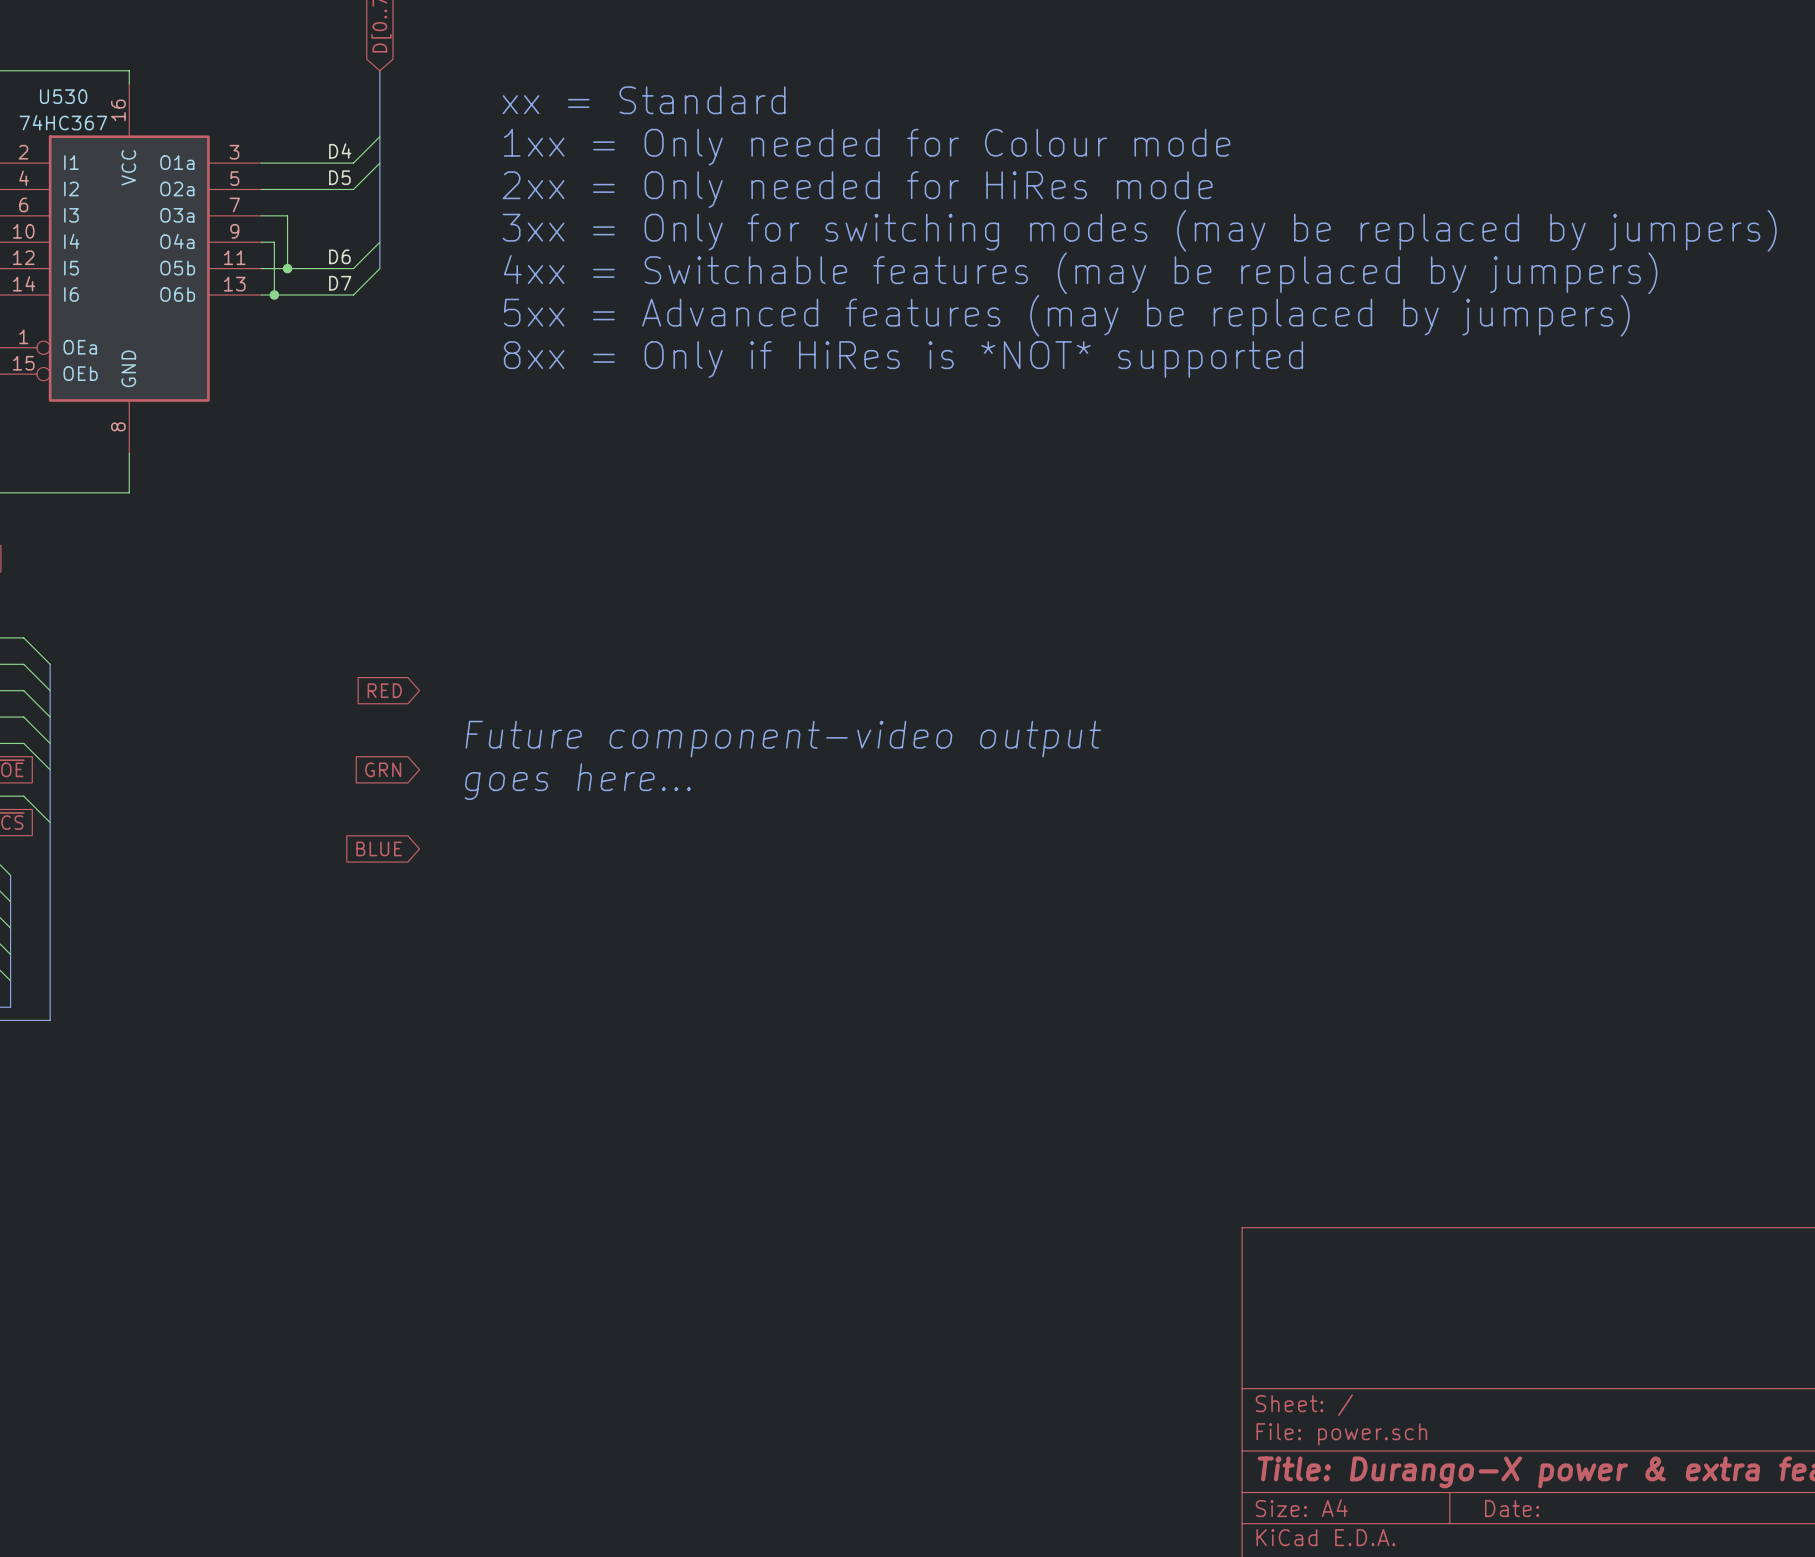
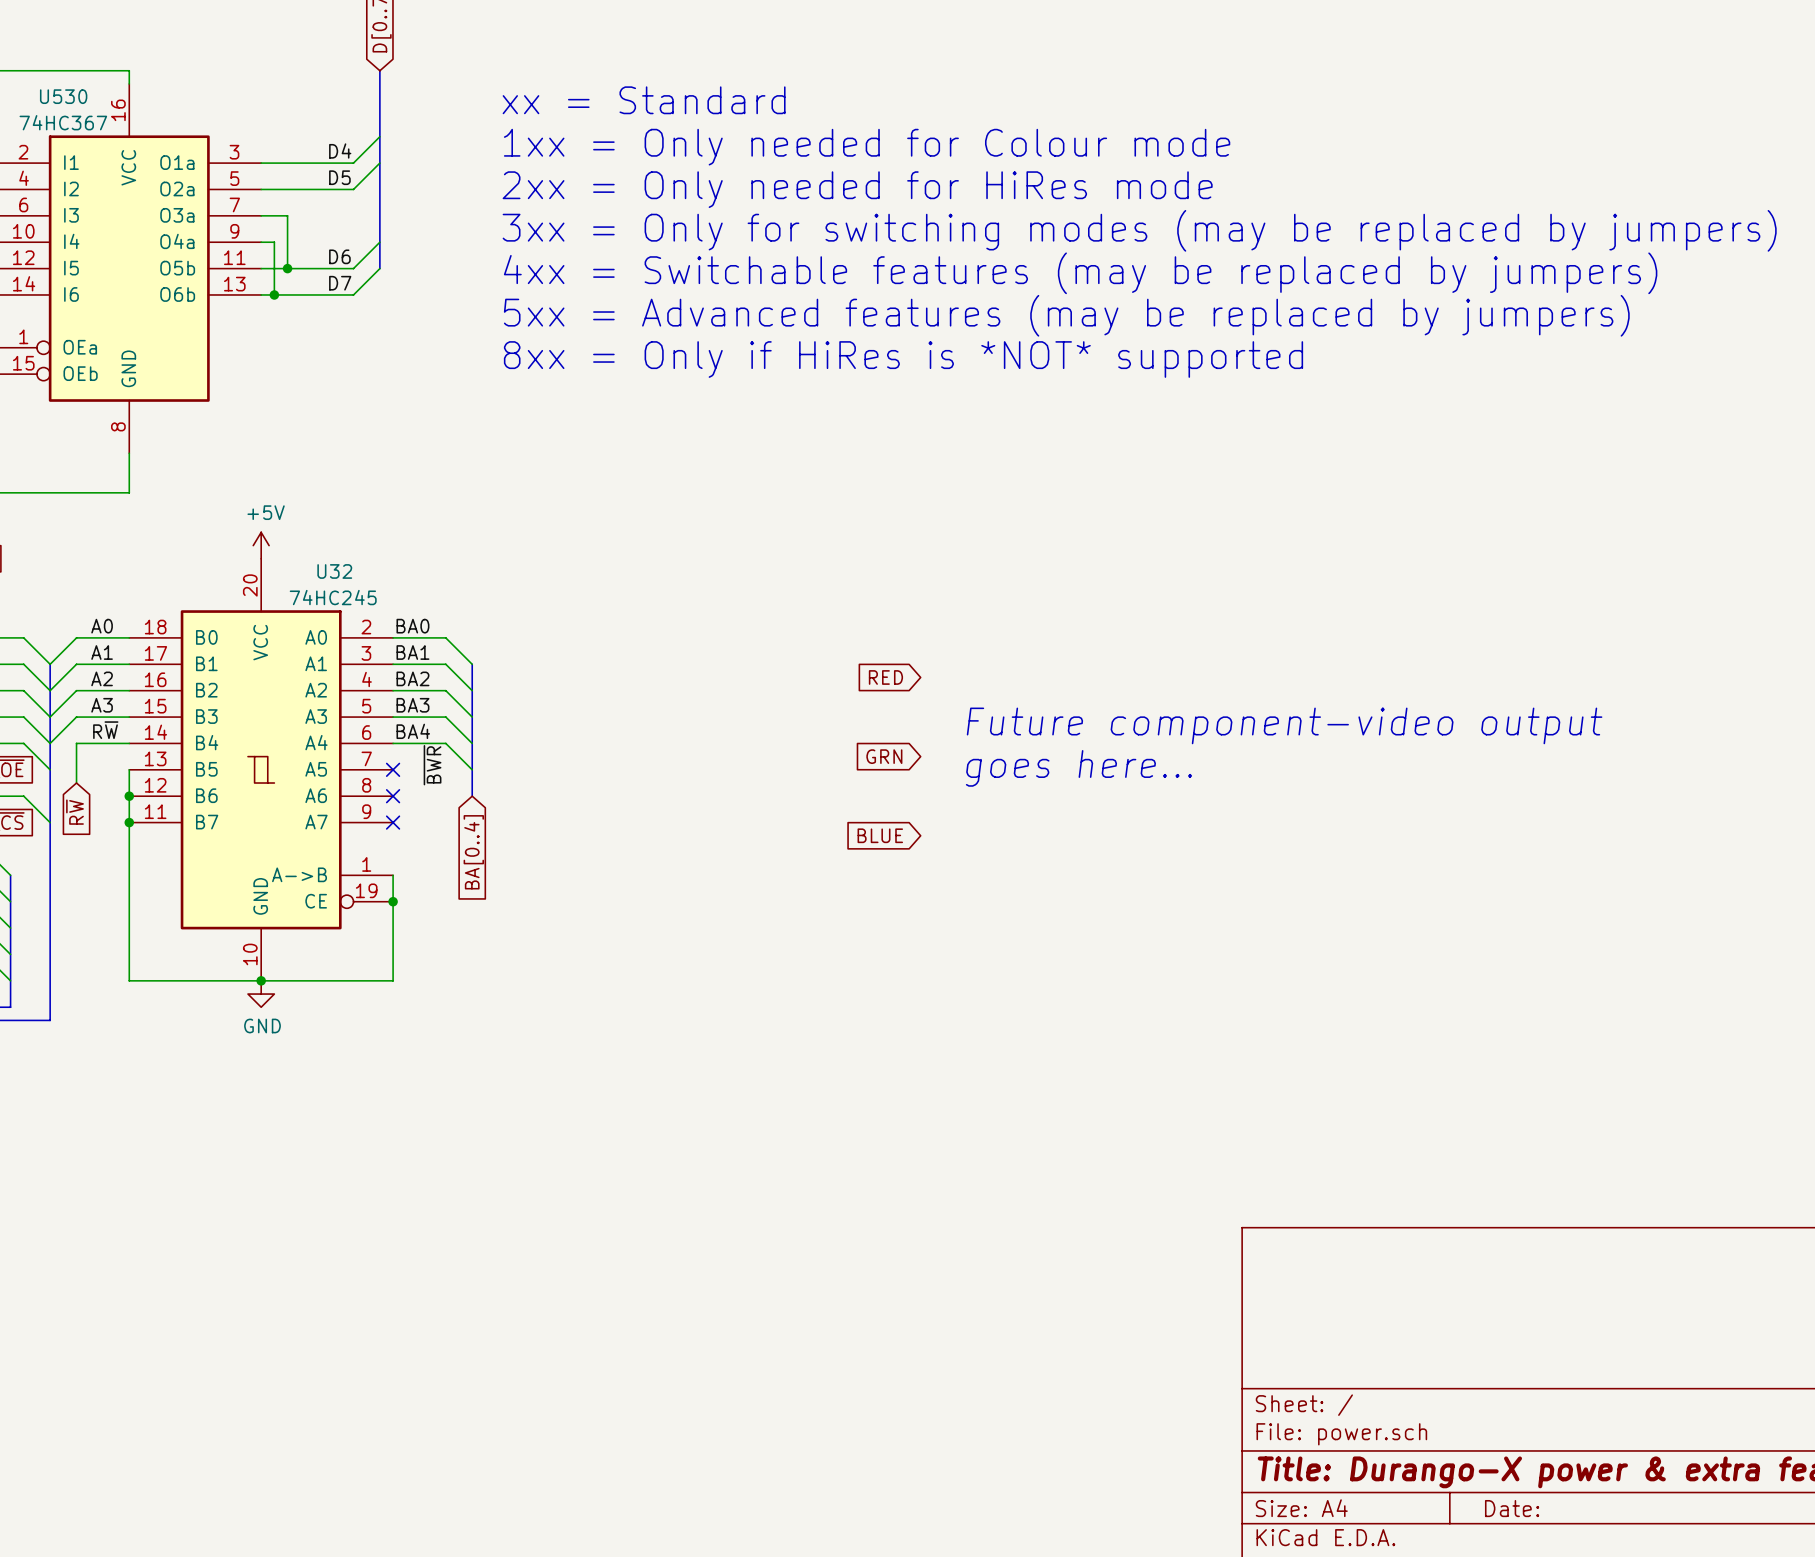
power symbol: none -> +5V (261, 545)
label: none -> A0 (102, 626)
label: none -> BA0 (412, 626)
wire: none -> (129, 637) (76, 637) (50, 664)
wire: none -> (393, 637) (445, 637) (472, 664)
label: none -> A1 (102, 652)
label: none -> BA1 (412, 652)
wire: none -> (129, 664) (76, 664) (50, 690)
wire: none -> (393, 664) (445, 664) (472, 690)
bus: none -> (472, 664) (472, 796)
global label: none -> RED (885, 677)
label: none -> A2 (102, 678)
label: none -> BA2 (412, 678)
wire: none -> (129, 690) (76, 690) (50, 717)
global label: RED (384, 690) -> none
wire: none -> (393, 690) (445, 690) (472, 717)
label: none -> A3 (102, 705)
label: none -> BA3 (412, 705)
wire: none -> (129, 717) (76, 717) (50, 743)
wire: none -> (393, 717) (445, 717) (472, 743)
text: none -> Future component-video output (1284, 725)
label: none -> R~{W} (105, 730)
label: none -> BA4 (413, 731)
text: Future component-video output (783, 739) -> none
wire: none -> (129, 743) (76, 743) (76, 783)
wire: none -> (393, 743) (445, 743) (472, 769)
global label: none -> GRN (884, 756)
label: none -> ~{BWR} (432, 765)
text: none -> goes here… (1078, 768)
wire: none -> (129, 769) (129, 980) (393, 980) (393, 875)
U32: none -> 74HC245 (261, 769)
global label: GRN (383, 769) -> none
no-connect mark: none -> (393, 769)
text: goes here… (577, 781) -> none
junction: none -> (129, 796)
no-connect mark: none -> (393, 796)
global label: none -> R~{W} (75, 812)
junction: none -> (129, 822)
no-connect mark: none -> (393, 822)
global label: none -> BLUE (880, 835)
global label: BLUE (379, 848) -> none
global label: none -> BA[0..4] (473, 852)
junction: none -> (393, 901)
junction: none -> (261, 980)
power symbol: none -> GND (261, 994)

